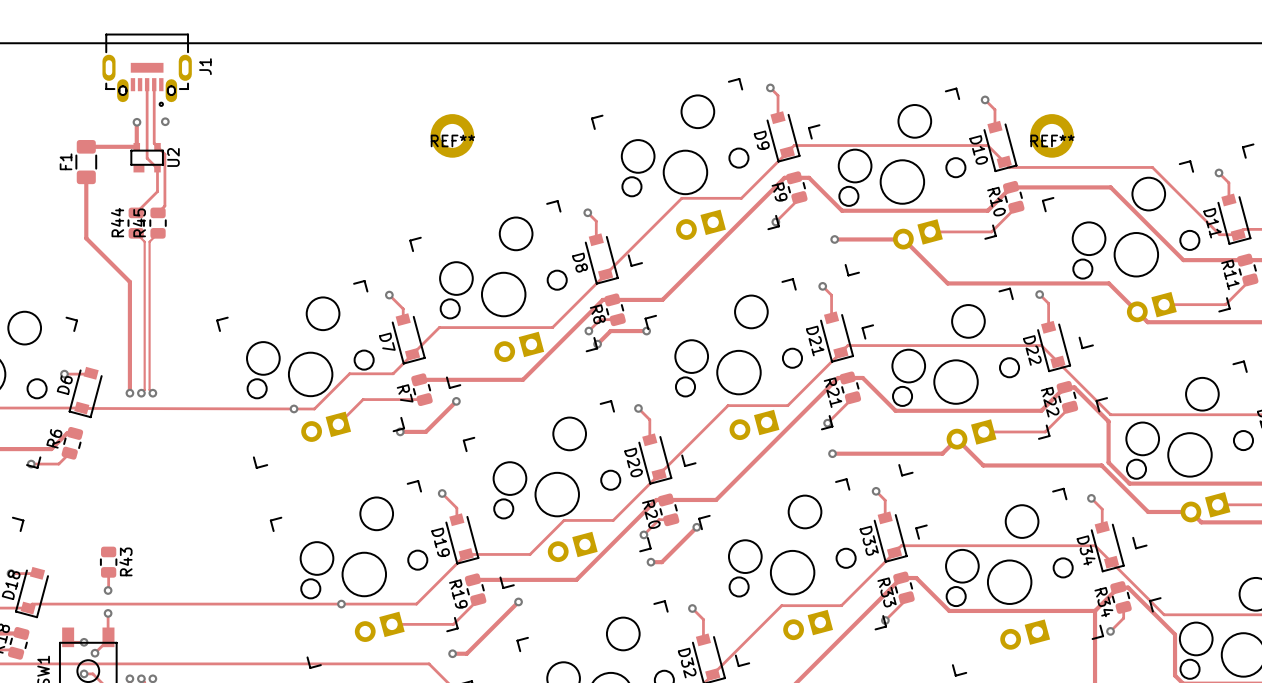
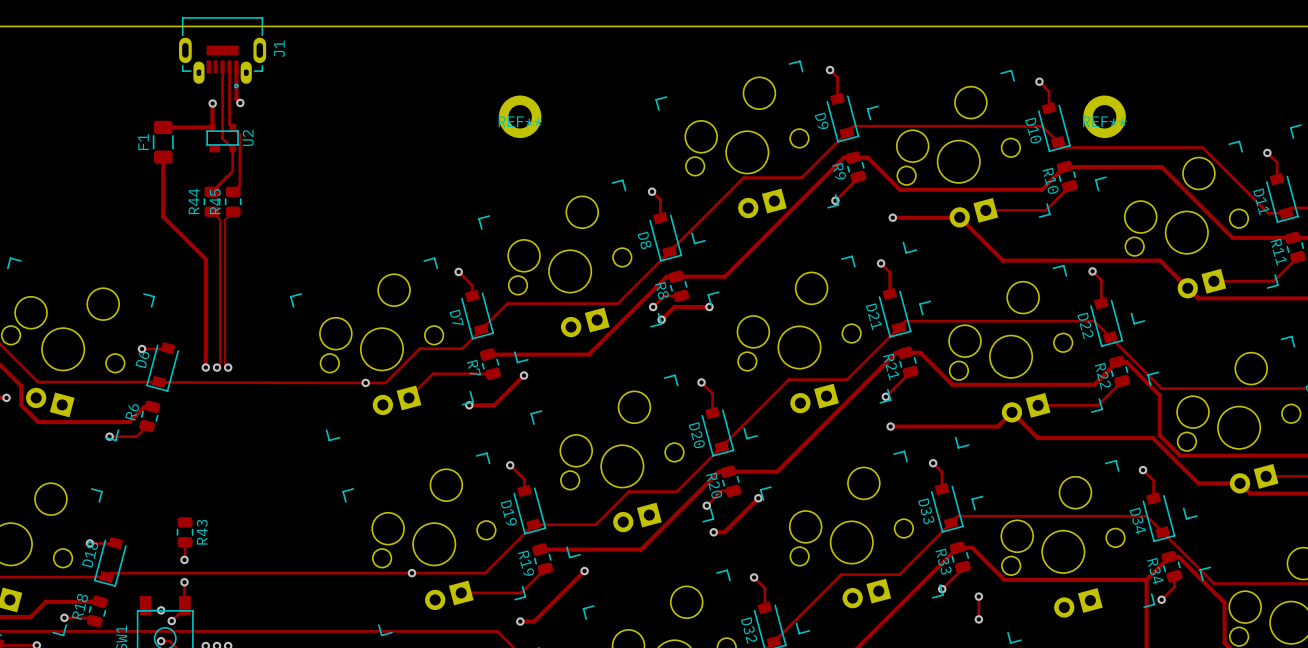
track: none -> (236, 66) (236, 99) (240, 102)
track: none -> (978, 596) (978, 619)
via: none -> (978, 596)
via: none -> (978, 619)

